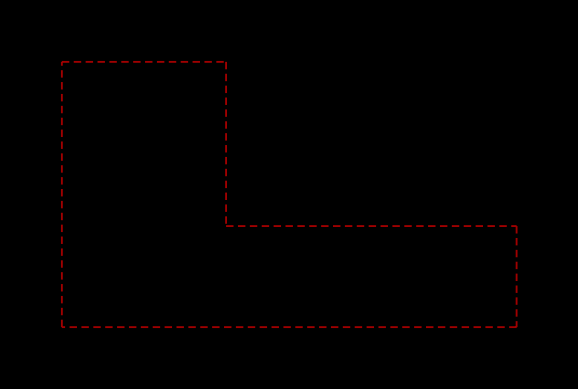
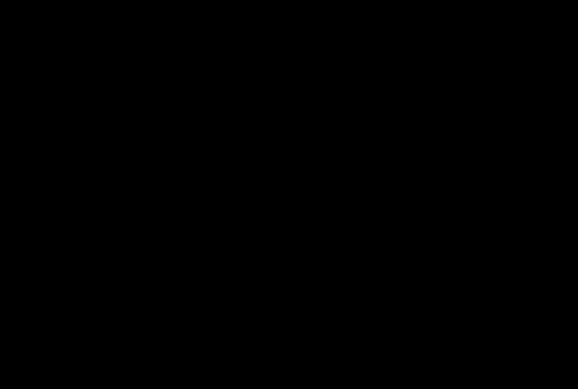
zone outline: (61, 61) (61, 327) (516, 327) (516, 226) (226, 226) (226, 61) (61, 61) -> none

